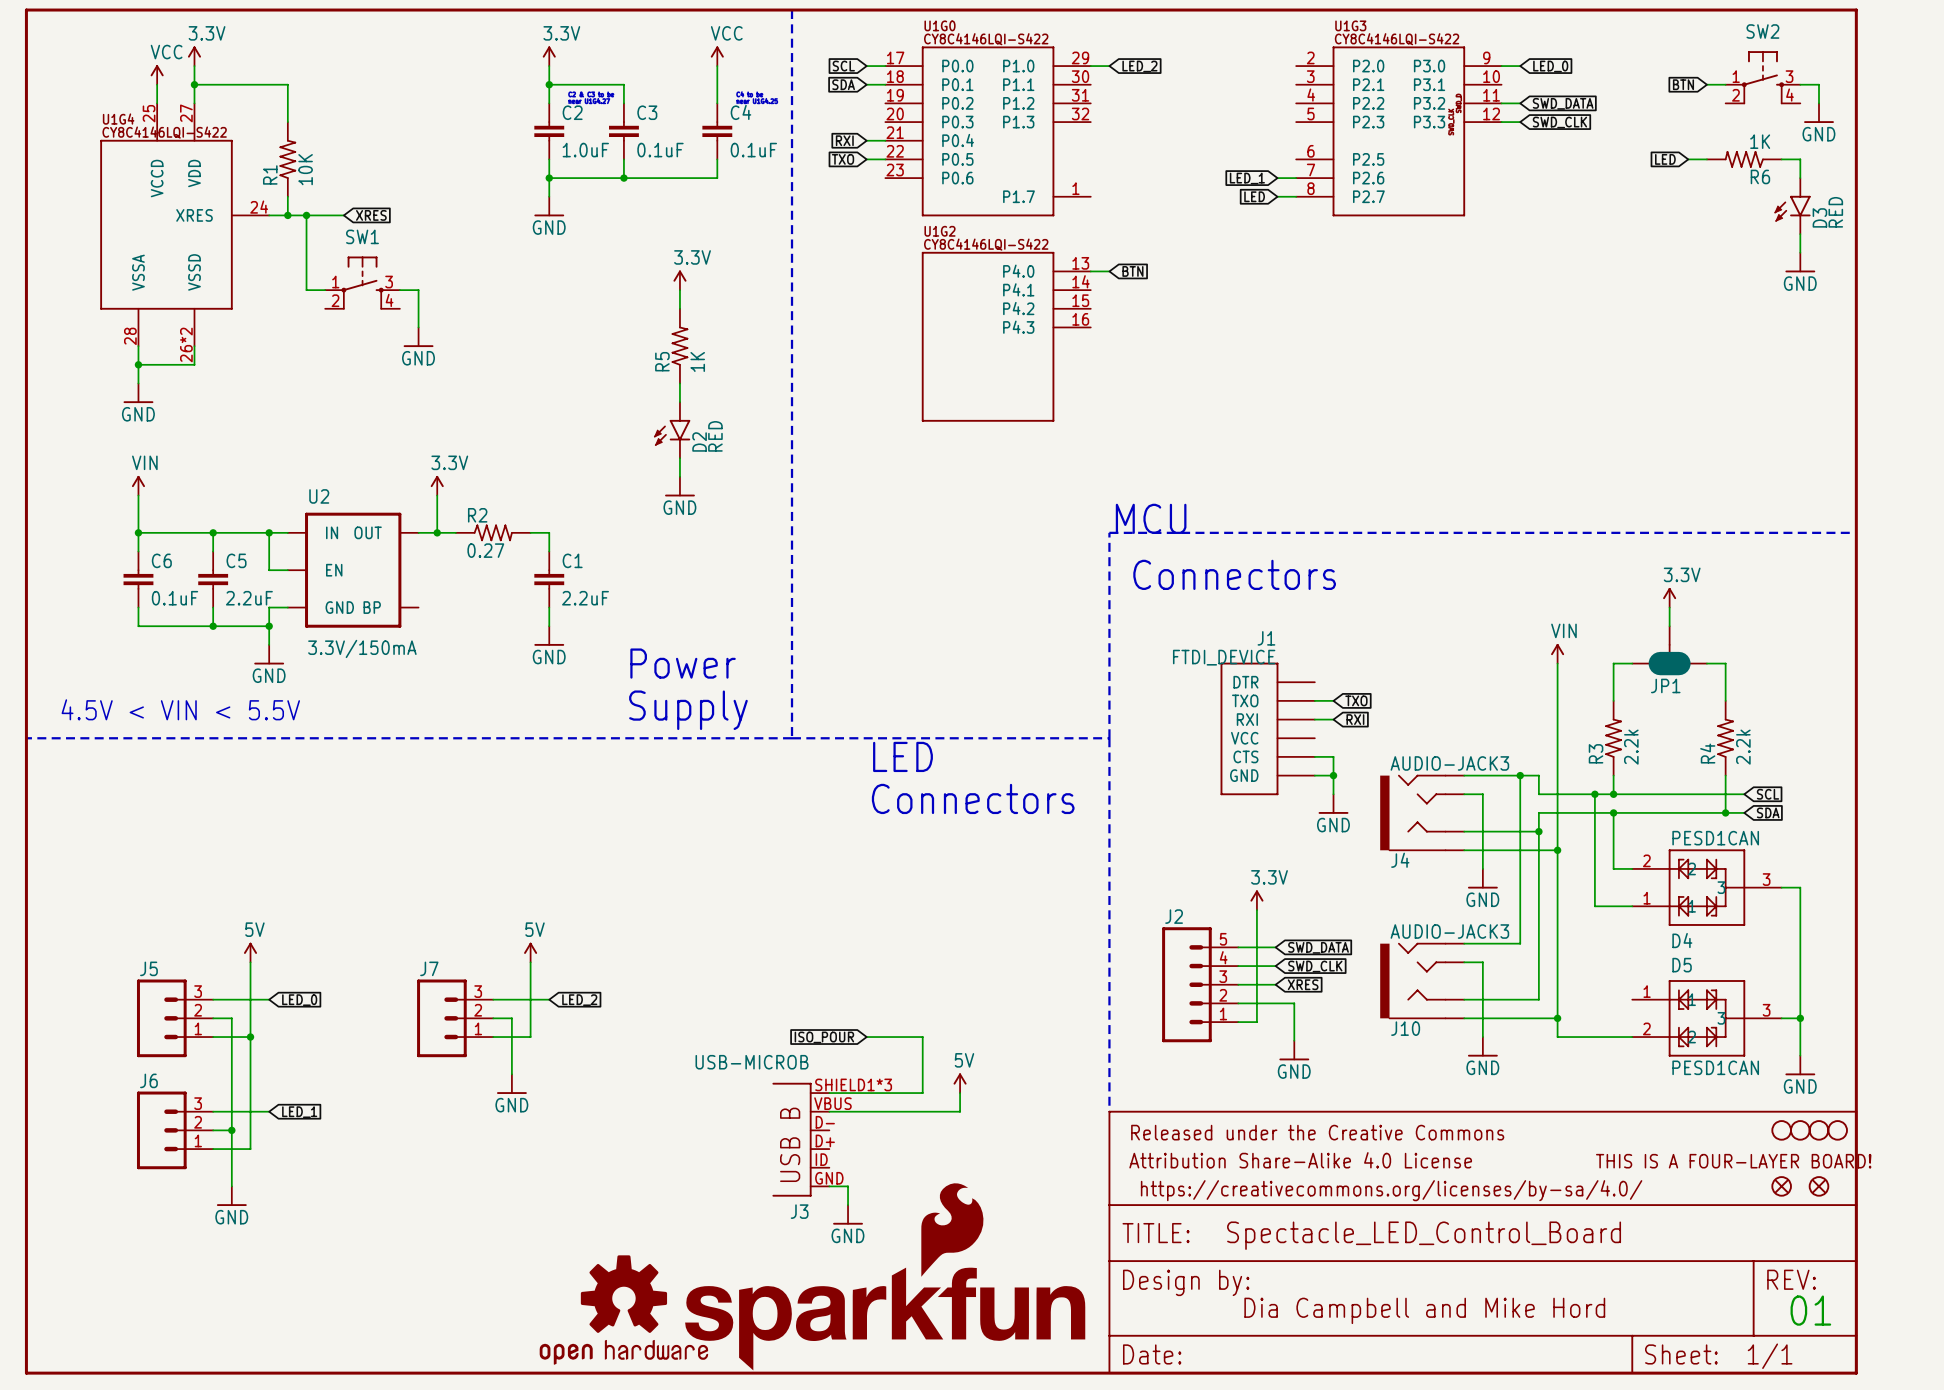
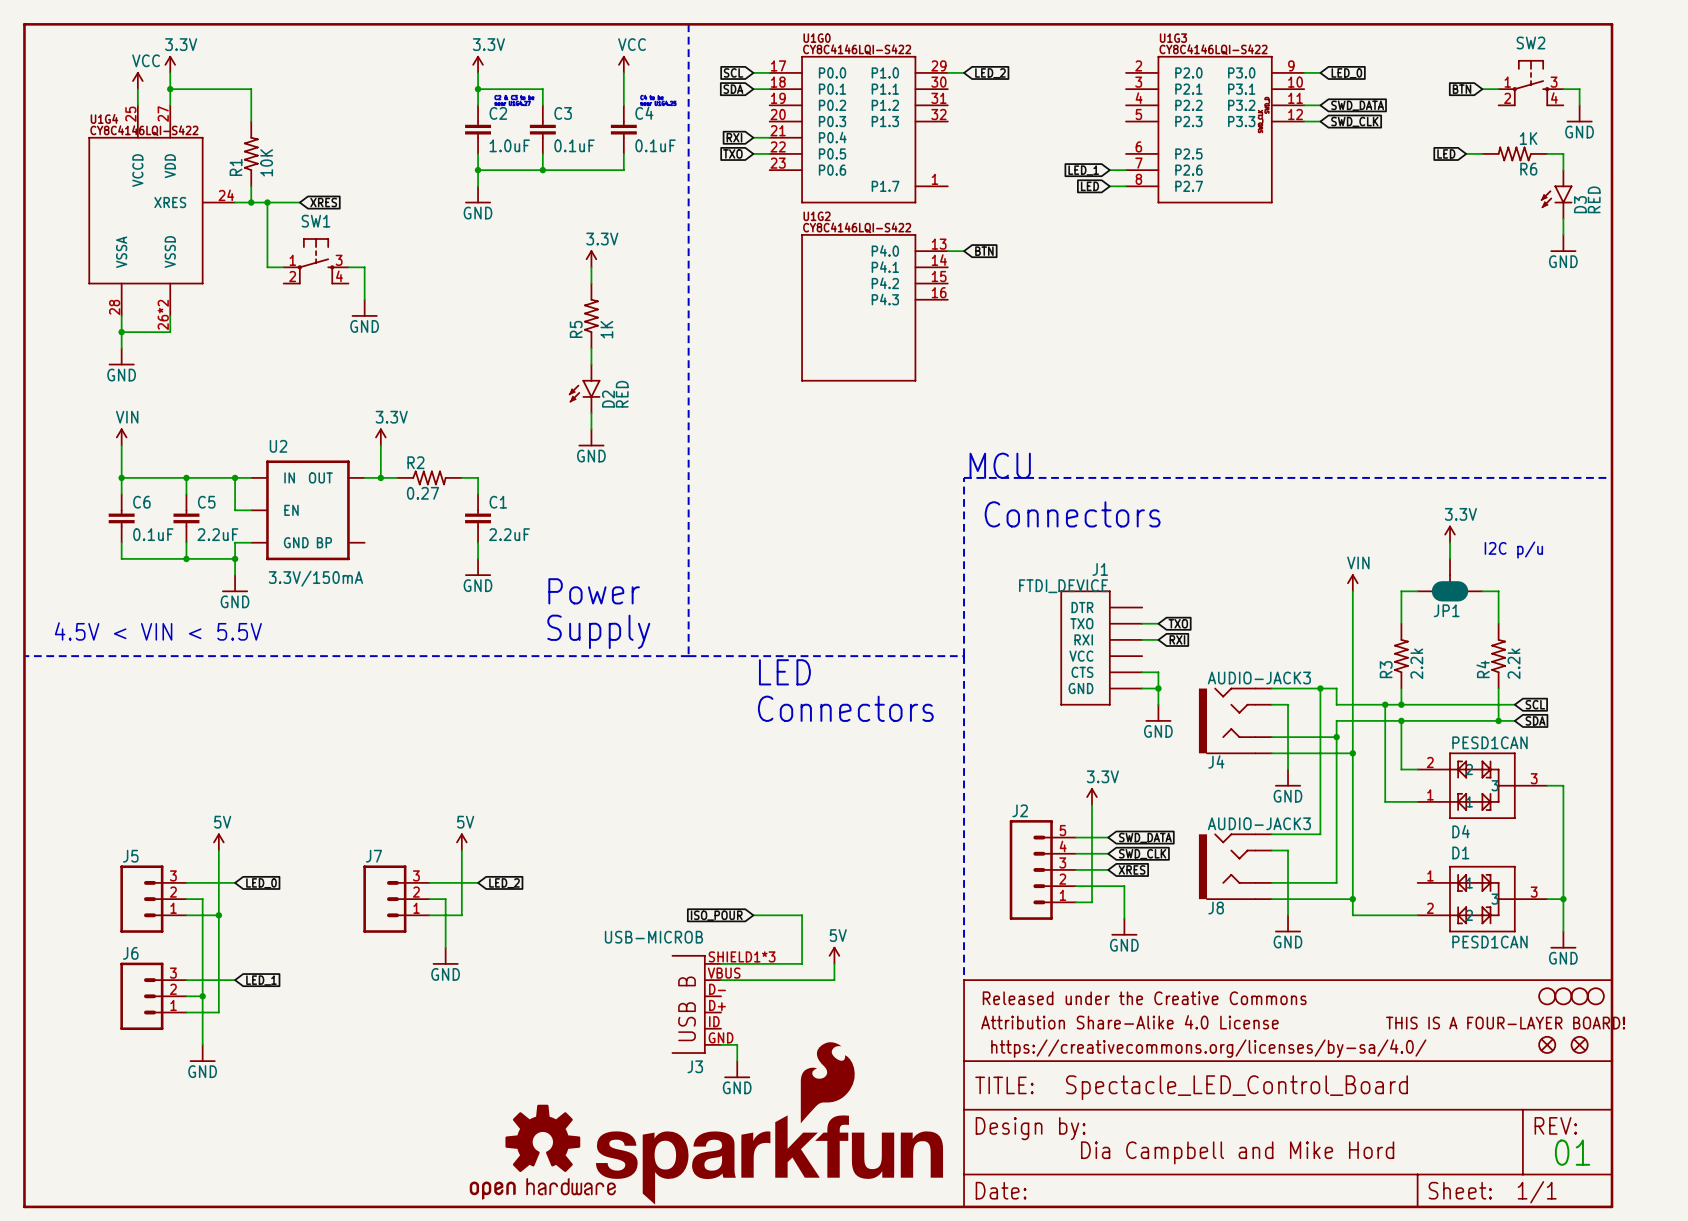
text: none -> I2C p/u (1513, 550)
D5 name: D5 (1682, 965) -> D1 (1460, 852)
J10 name: J10 (1405, 1028) -> J8 (1216, 908)

